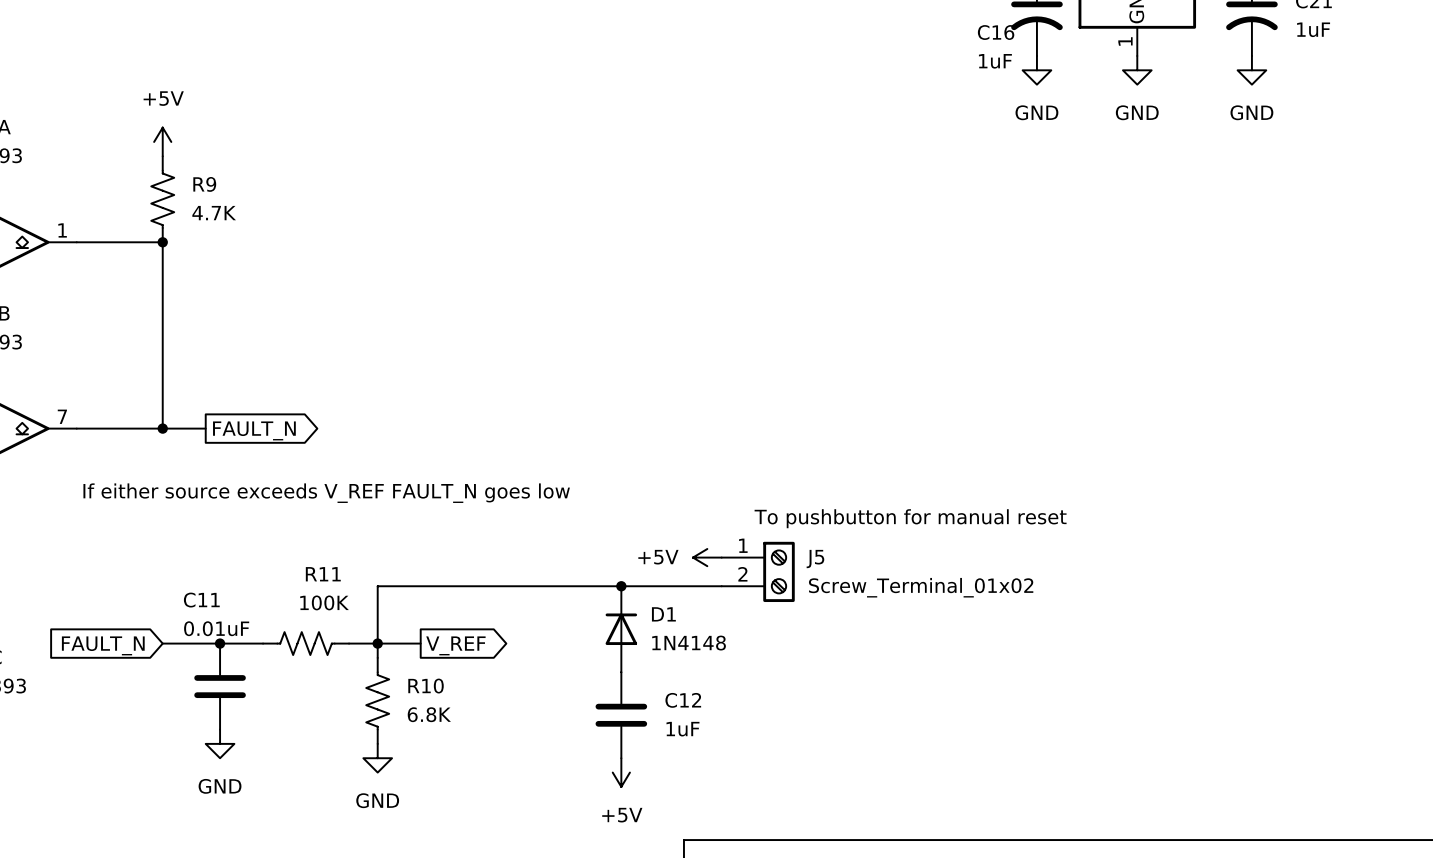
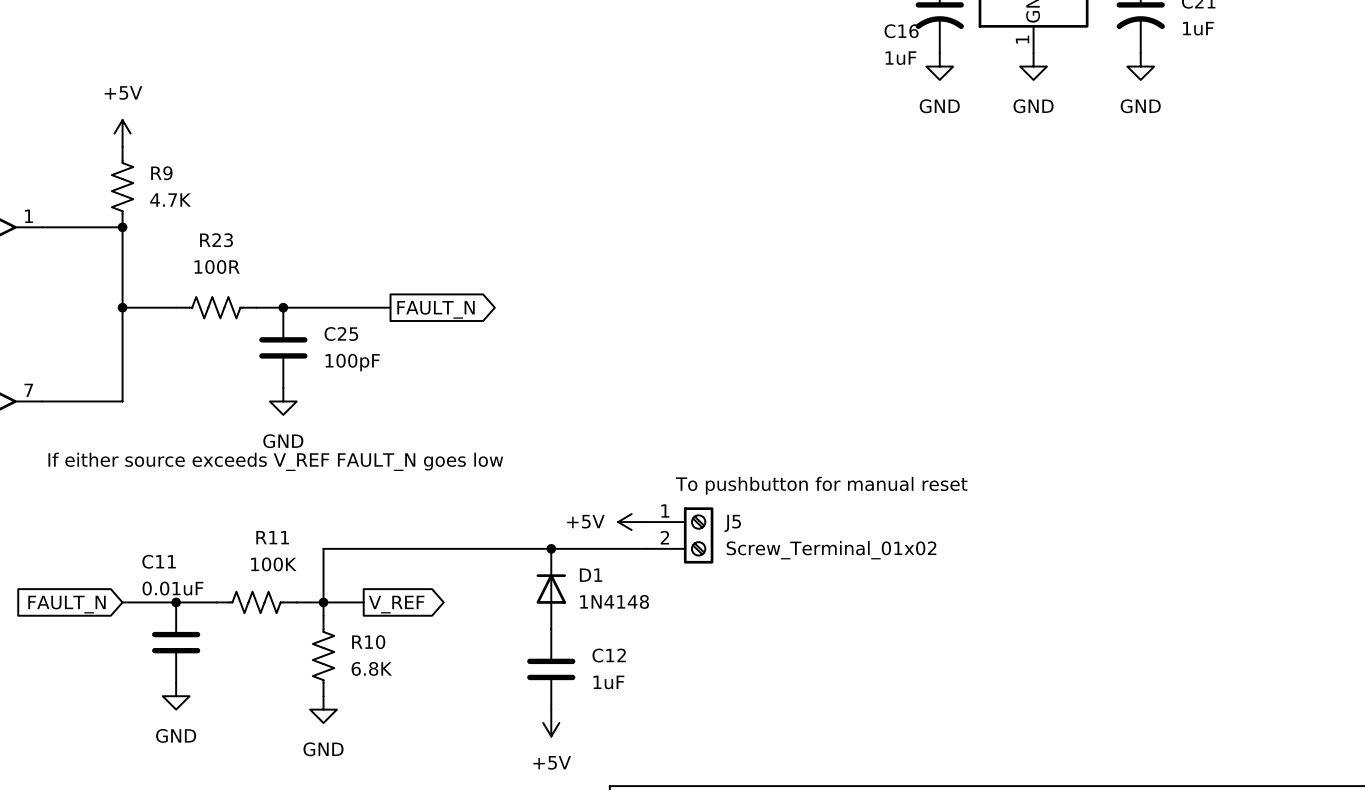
wire: none -> (122, 307) (176, 307)
junction: none -> (122, 307)
R23: none -> 100R (216, 307)
wire: none -> (256, 307) (390, 307)
junction: none -> (283, 307)
C25: none -> 100pF (283, 347)
wire: (162, 428) (205, 428) -> none
junction: (162, 428) -> none
power symbol: none -> GND (283, 401)
global label position: FAULT_N (254, 430) -> FAULT_N (436, 309)

